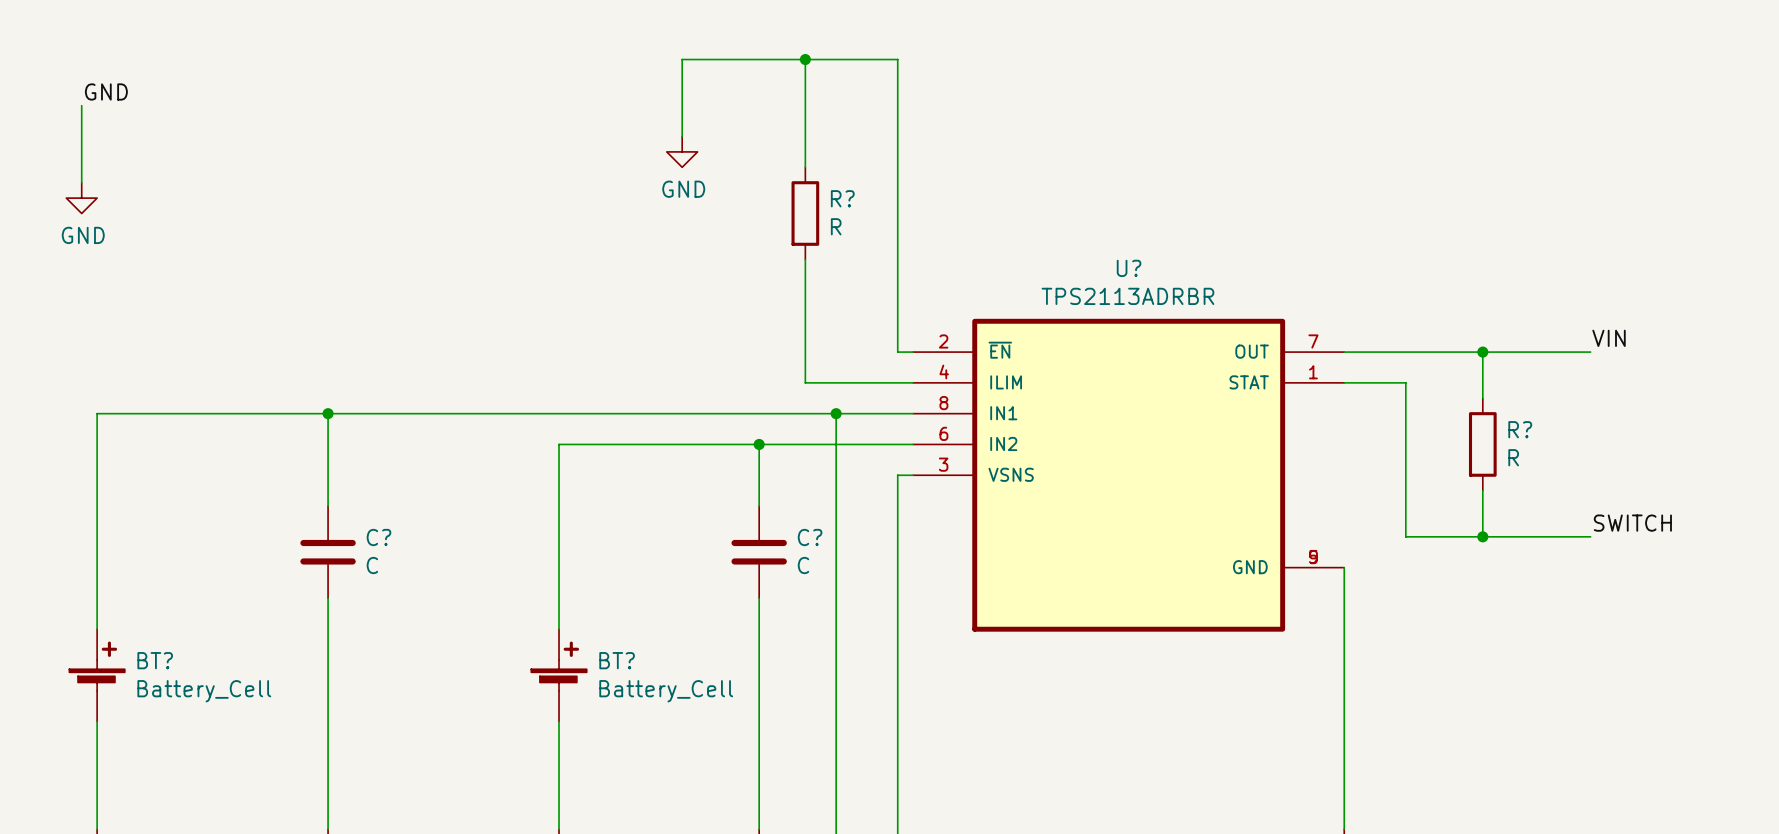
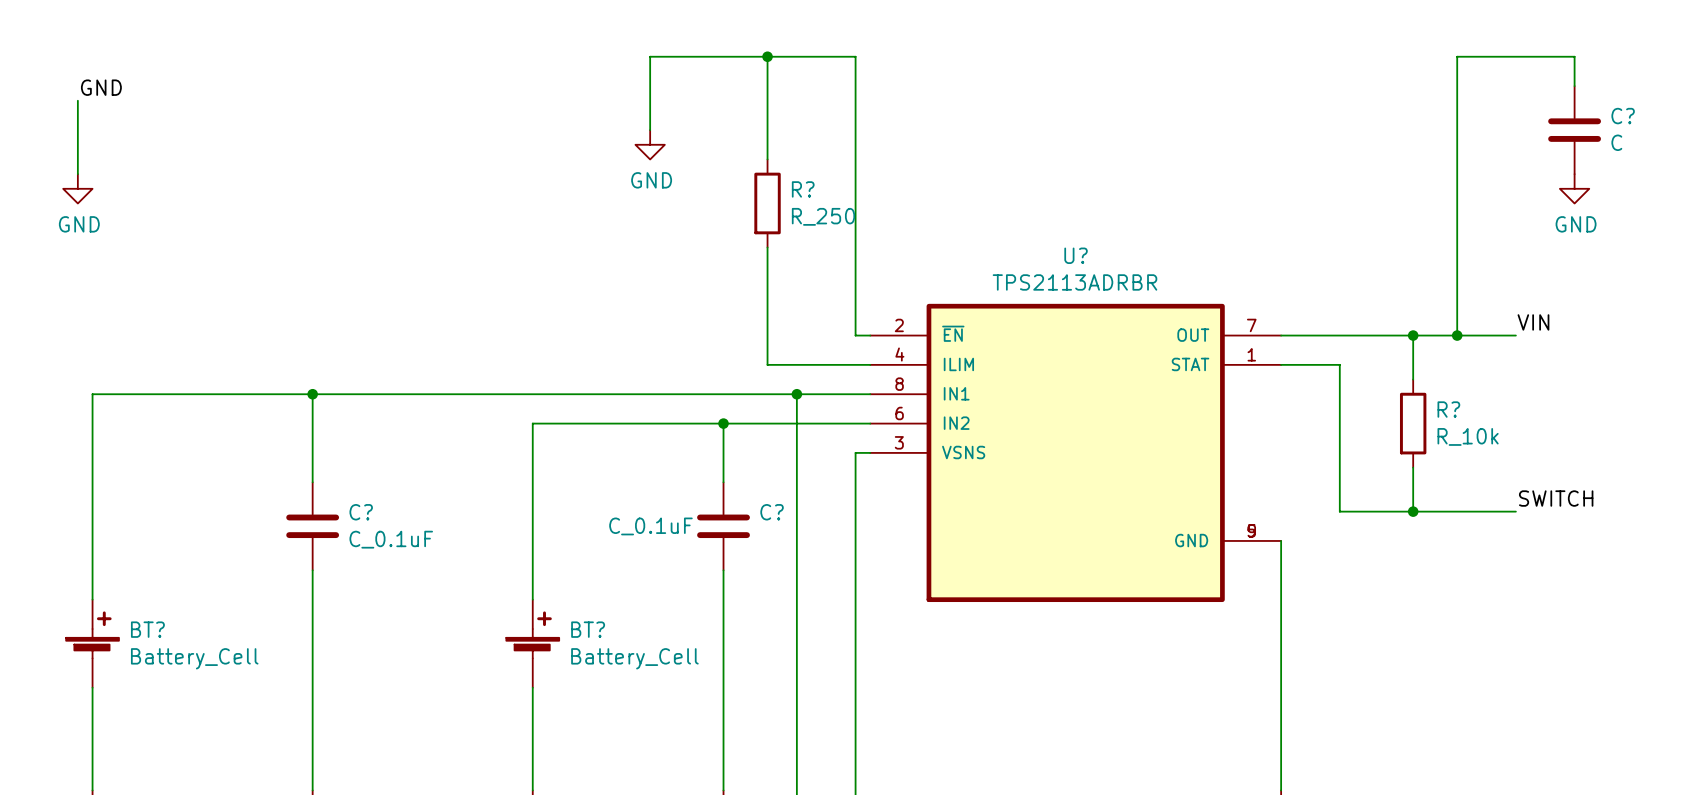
wire: none -> (1574, 86) (1574, 56) (1457, 56) (1457, 335)
C?: none -> C (1574, 130)
power symbol: none -> GND (1574, 188)
R? value: R (836, 226) -> R_250 (823, 216)
junction: none -> (1457, 335)
R? value: R (1513, 457) -> R_10k (1468, 436)
C? value: C (372, 565) -> C_0.1uF (391, 539)
C? value: C (803, 565) -> C_0.1uF (650, 526)

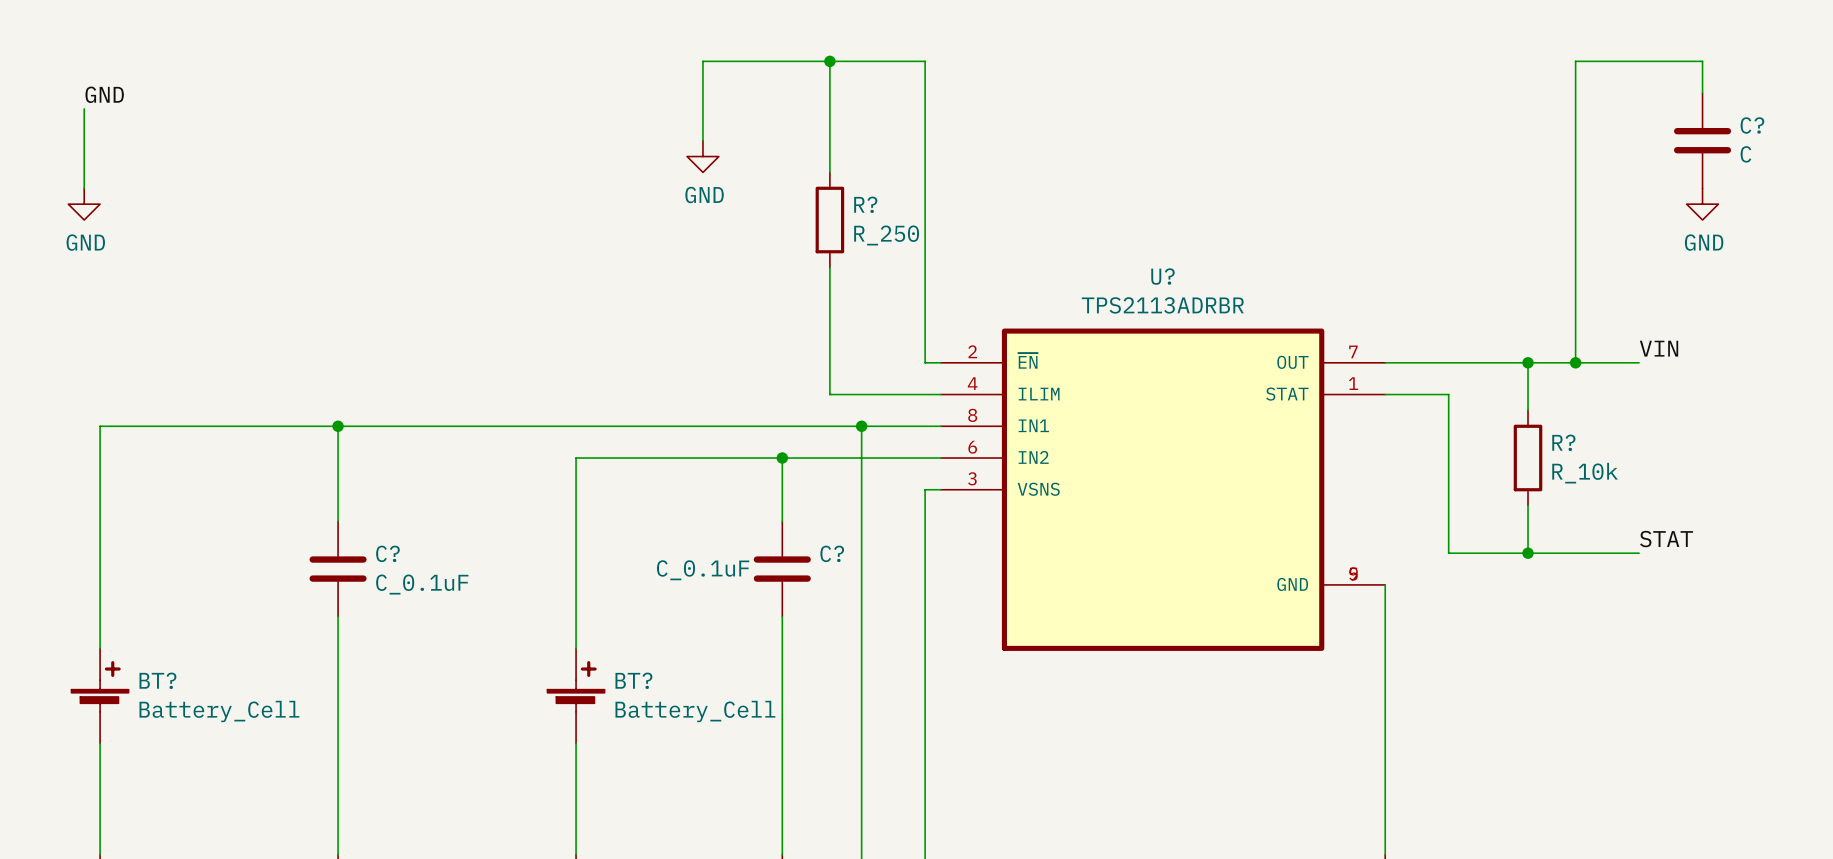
label: SWITCH (1556, 498) -> STAT (1666, 539)

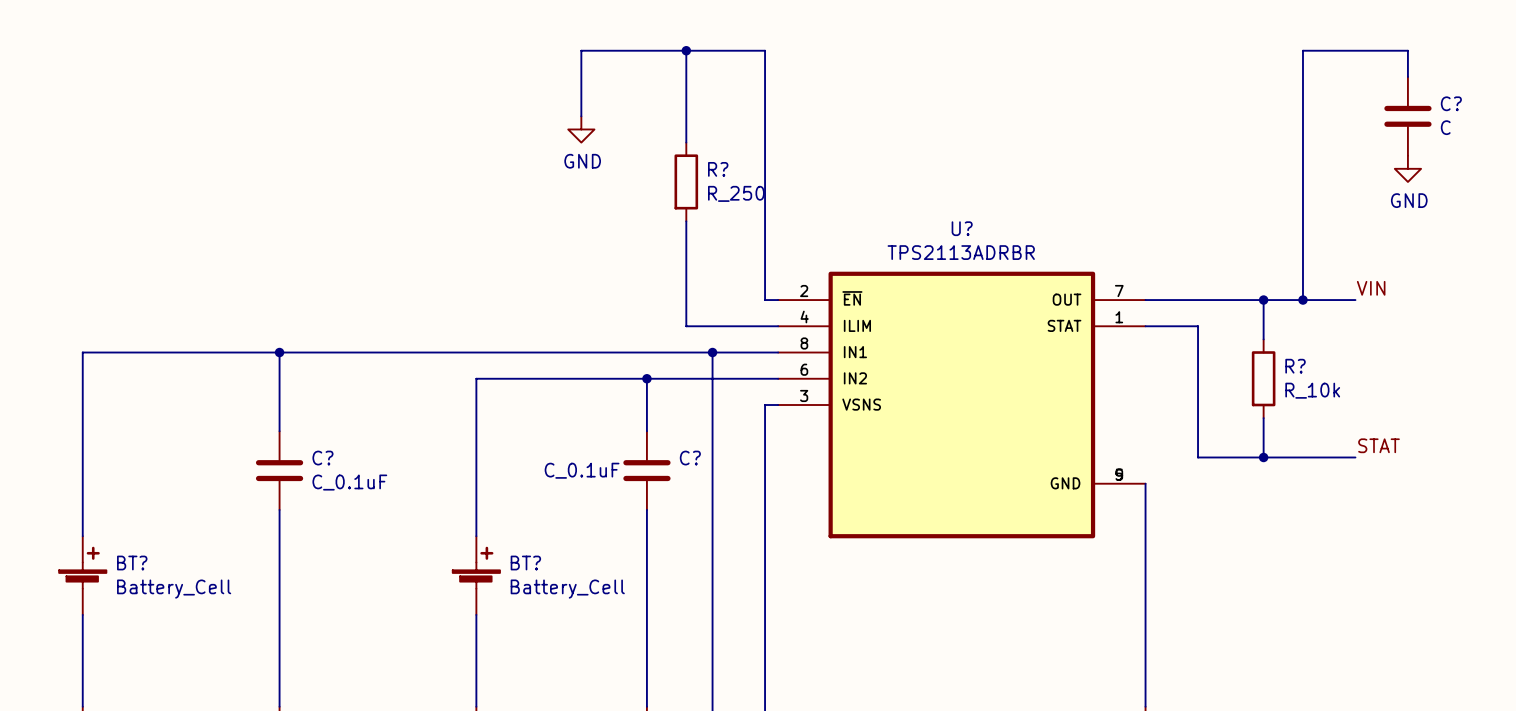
label: GND (104, 94) -> none
wire: (84, 108) (84, 188) -> none
power symbol: GND (84, 204) -> none

